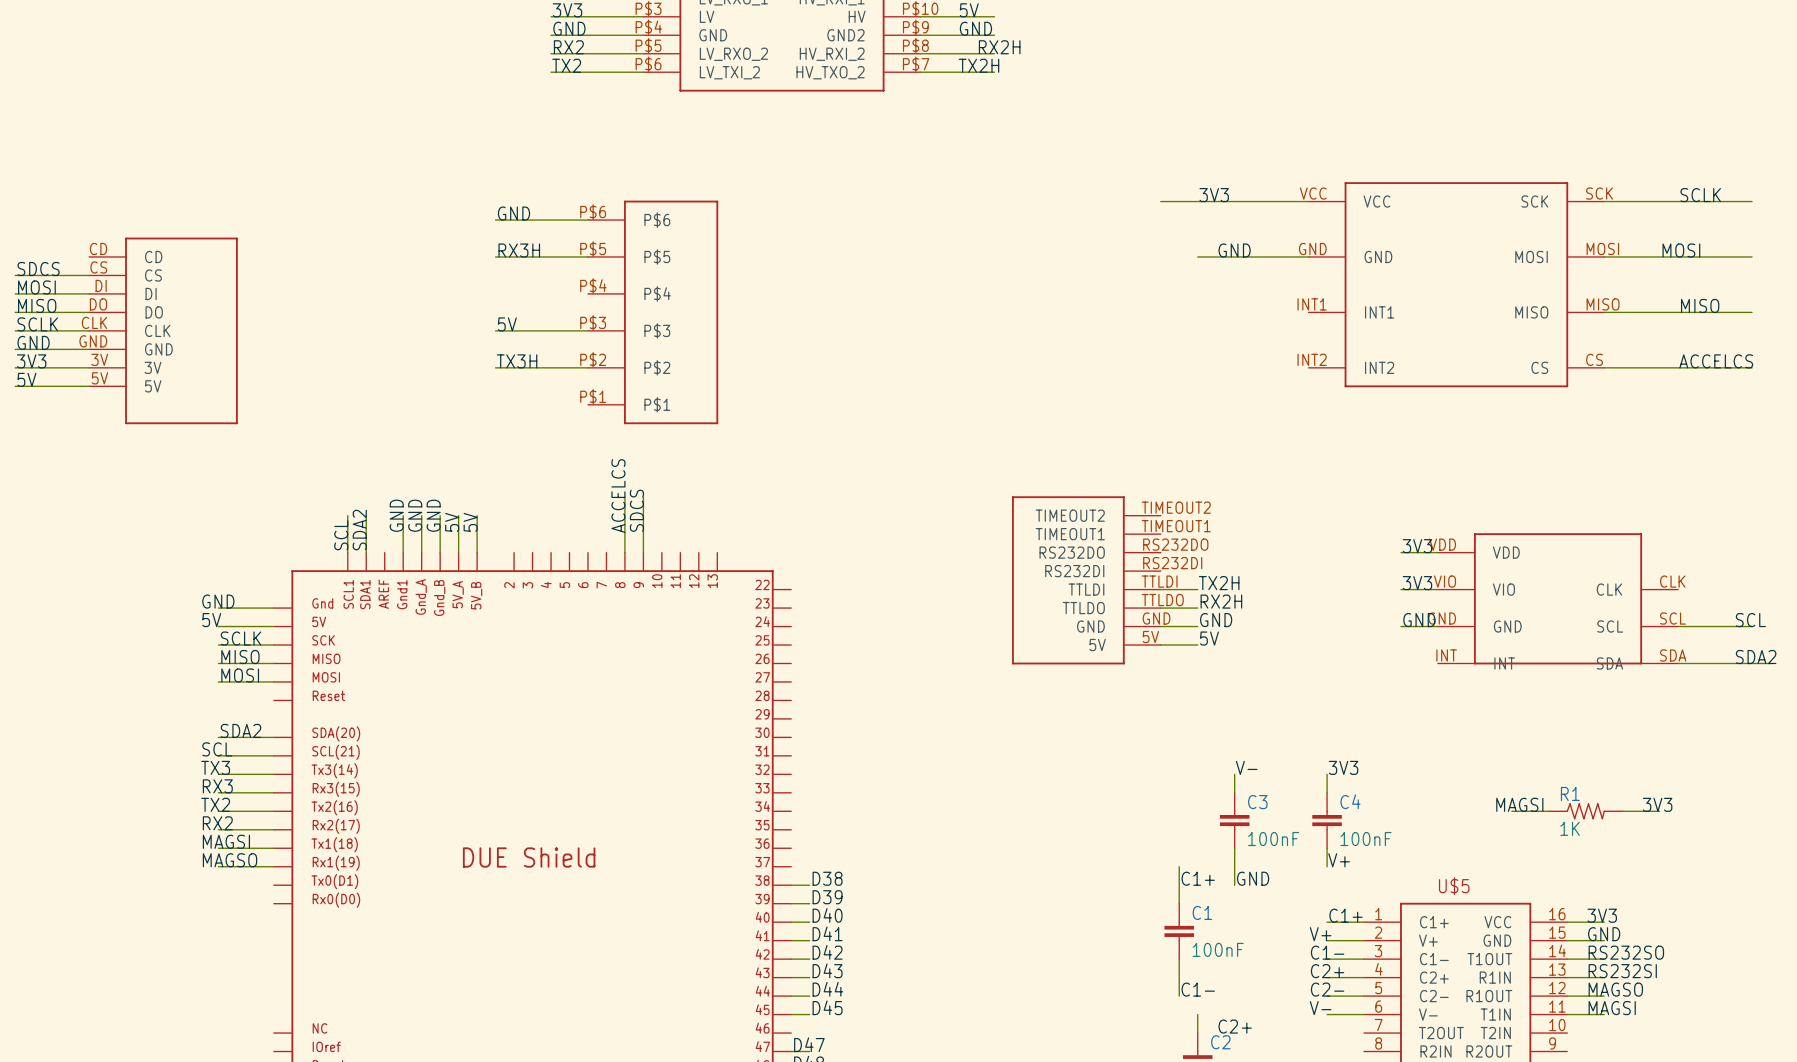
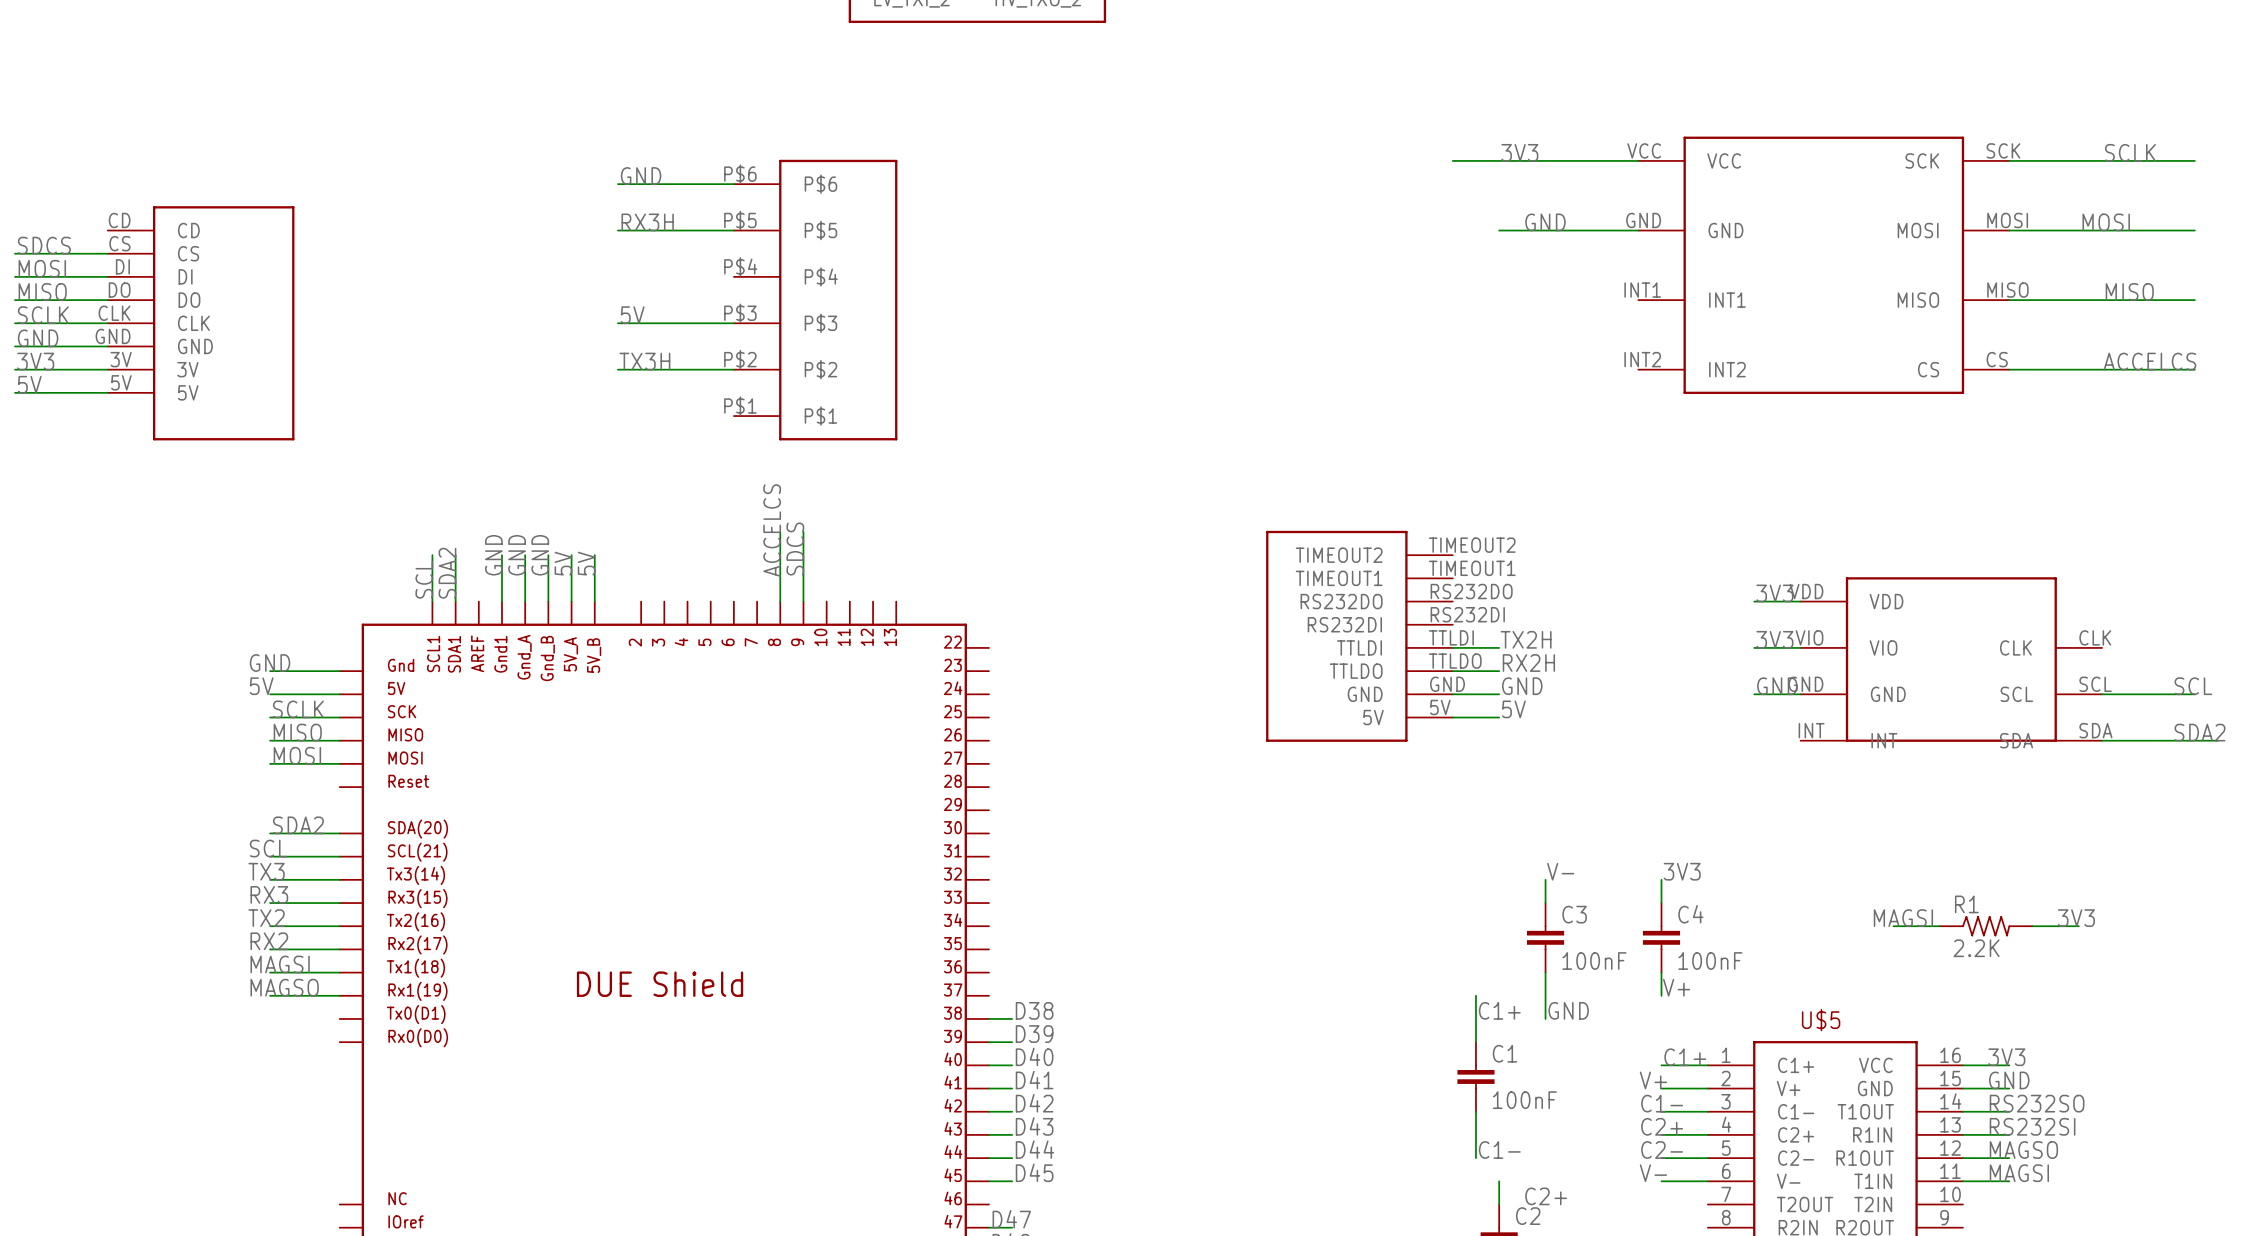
R1 value: 1K (1570, 828) -> 2.2K (1976, 948)

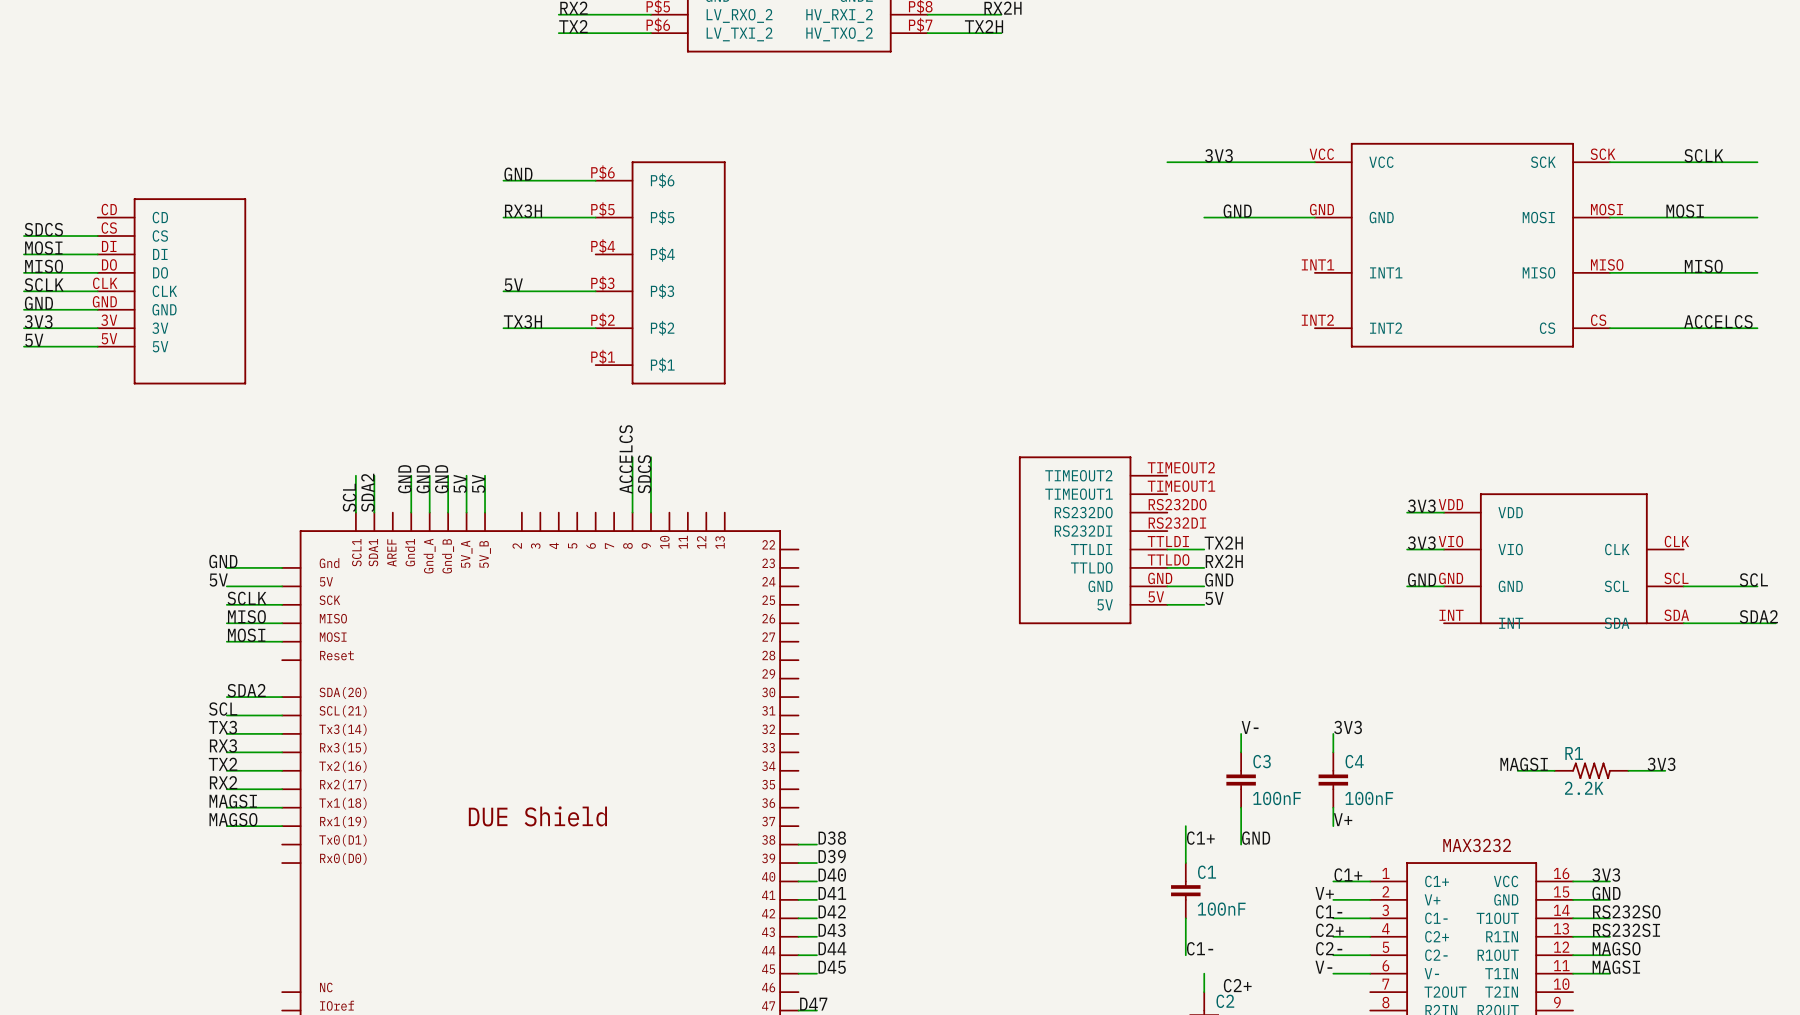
U$5 name: U$5 (1821, 1020) -> MAX3232 (1477, 845)

